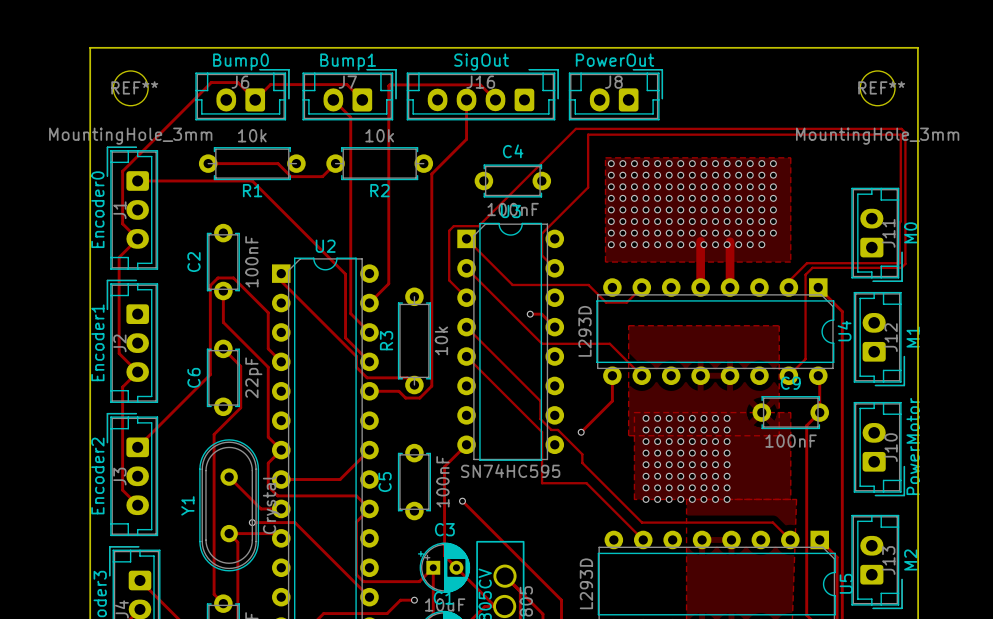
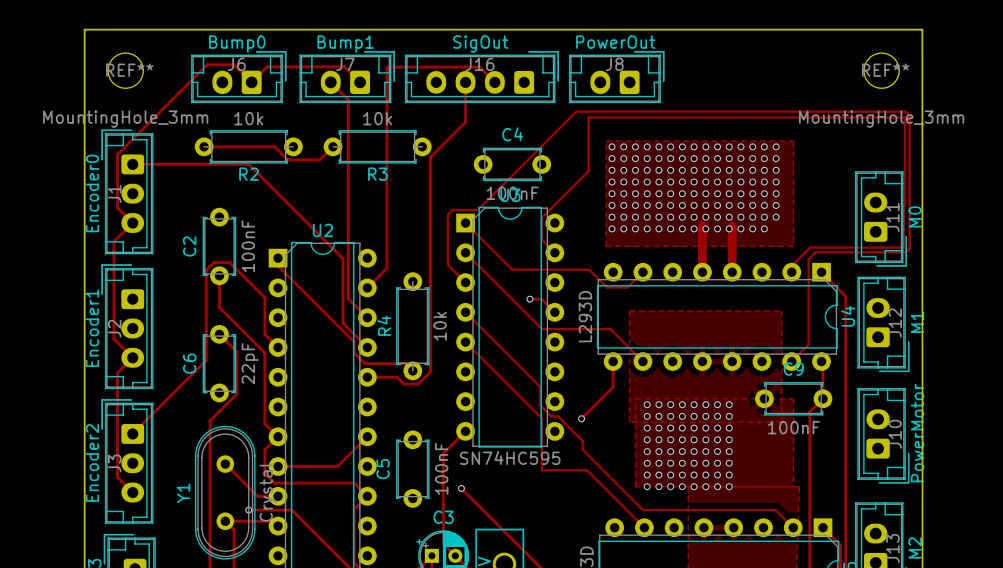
R1 name: R1 (252, 190) -> R2 (249, 174)
R2 name: R2 (379, 190) -> R3 (377, 174)
R3 name: R3 (386, 340) -> R4 (384, 325)

